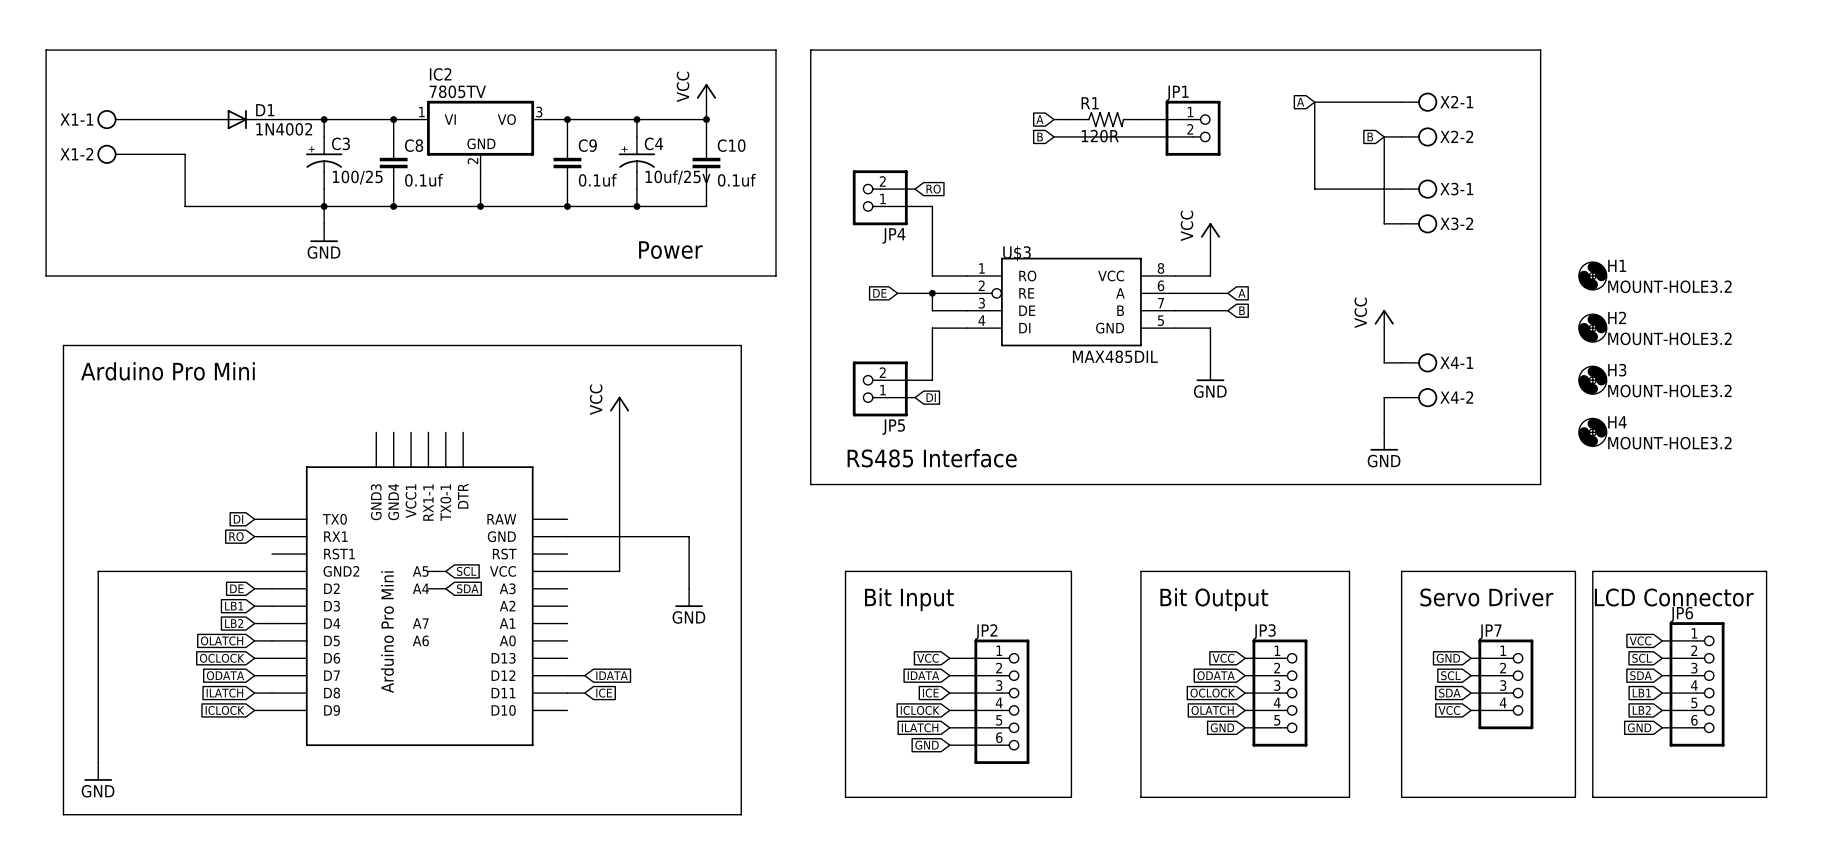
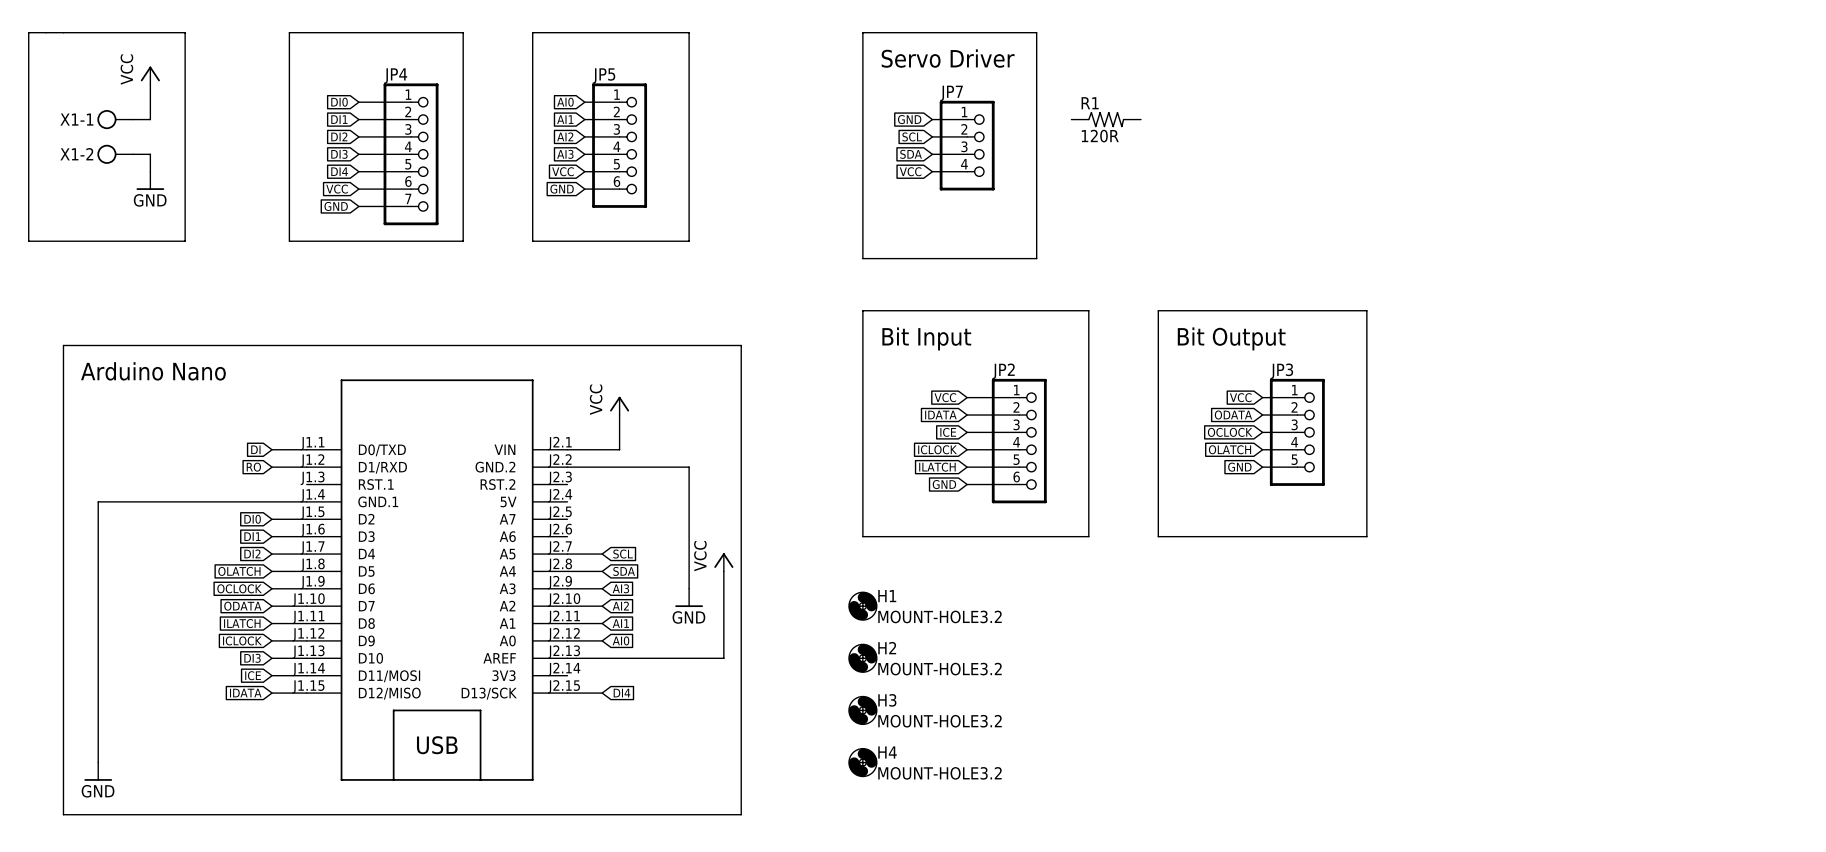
wire: none -> (289, 32) (463, 32) (463, 241) (289, 241) (289, 32)
wire: none -> (532, 32) (689, 32) (689, 241) (532, 241) (532, 32)
wire: none -> (862, 32) (862, 258) (1036, 258) (1036, 32) (862, 32)
wire: (46, 50) (46, 275) (775, 275) (775, 50) (46, 50) -> none
text: none -> Servo Driver (948, 58)
power symbol: none -> VCC (150, 75)
power symbol: VCC (706, 93) -> none
global label: none -> DI0 (339, 102)
wire: none -> (358, 102) (411, 102)
global label: none -> AI0 (565, 102)
wire: (706, 102) (706, 136) -> none
global label: A (1300, 102) -> none
wire: (1401, 102) (1314, 102) (1314, 189) (1401, 189) -> none
X2-1: (1419, 102) -> none
wire: (150, 119) (219, 119) -> (150, 119) (150, 84)
D1: 1N4002 (237, 119) -> none
wire: (254, 119) (358, 119) -> none
wire: (324, 119) (324, 136) -> none
junction: (324, 119) -> none
global label: none -> DI1 (339, 119)
wire: (393, 119) (393, 136) -> none
junction: (393, 119) -> none
wire: (550, 119) (584, 119) -> (584, 102) (619, 102)
global label: none -> AI1 (565, 119)
wire: (567, 119) (567, 136) -> none
junction: (567, 119) -> none
wire: (619, 119) (706, 119) -> none
wire: (636, 119) (636, 136) -> none
junction: (636, 119) -> none
junction: (706, 119) -> none
global label: none -> GND (909, 119)
wire: none -> (932, 119) (967, 119)
global label: A (1039, 119) -> none
wire: (1054, 119) (1071, 119) -> none
wire: (1140, 119) (1193, 119) -> none
JP1: (1193, 128) -> none
global label: none -> DI2 (339, 136)
wire: none -> (358, 136) (411, 136)
IC2: 7805TV (480, 136) -> none
global label: none -> AI2 (565, 136)
wire: none -> (584, 136) (619, 136)
global label: none -> SCL (912, 136)
wire: none -> (932, 136) (967, 136)
global label: B (1040, 136) -> none
wire: (1054, 136) (1193, 136) -> none
global label: B (1370, 136) -> none
wire: (1401, 136) (1384, 136) (1384, 223) (1401, 223) -> none
X2-2: (1419, 136) -> none
wire: (150, 154) (185, 154) -> (150, 154) (150, 171)
global label: none -> DI3 (339, 154)
wire: none -> (358, 154) (411, 154)
global label: none -> AI3 (565, 154)
wire: none -> (584, 154) (619, 154)
global label: none -> SDA (911, 154)
wire: none -> (932, 154) (967, 154)
C3: 100/25 (324, 163) -> none
C8: 0.1uf (393, 163) -> none
C9: 0.1uf (567, 163) -> none
C4: 10uf/25v (636, 163) -> none
C10: 0.1uf (706, 163) -> none
JP4 symbol: [852, 170, 908, 226] -> [383, 83, 439, 226]
global label: none -> DI4 (339, 171)
wire: none -> (358, 171) (411, 171)
wire: (480, 171) (480, 206) -> none
global label: none -> VCC (562, 171)
wire: none -> (584, 171) (619, 171)
global label: none -> VCC (910, 171)
power symbol: none -> GND (150, 180)
wire: (324, 189) (324, 223) -> none
global label: none -> VCC (337, 189)
wire: none -> (358, 189) (411, 189)
wire: (393, 189) (393, 206) -> none
global label: none -> GND (562, 189)
wire: (567, 189) (567, 206) -> none
wire: none -> (584, 189) (619, 189)
wire: (636, 189) (636, 206) -> none
wire: (706, 189) (706, 206) (411, 206) -> none
wire: (880, 189) (915, 189) -> (932, 171) (967, 171)
global label: RO (933, 189) -> none
X3-1: (1419, 189) -> none
wire: (185, 206) (358, 206) -> (185, 206) (185, 241) (28, 241) (28, 32) (185, 32) (185, 154)
junction: (324, 206) -> none
global label: none -> GND (336, 206)
junction: (393, 206) -> none
junction: (480, 206) -> none
junction: (567, 206) -> none
junction: (636, 206) -> none
wire: (880, 206) (932, 206) (932, 275) (967, 275) -> none
X3-2: (1419, 223) -> none
power symbol: GND (324, 232) -> none
power symbol: VCC (1210, 232) -> none
JP4 name position: JP4 (894, 235) -> JP4 (395, 76)
wire: (1210, 241) (1210, 275) (1175, 275) -> none
text: Power (670, 250) -> none
H1 position: (1592, 275) -> (862, 606)
global label: DE (879, 293) -> none
wire: (897, 293) (967, 293) -> none
wire: (932, 293) (932, 310) -> (967, 310) (1088, 310) (1088, 536) (862, 536) (862, 310) (932, 310)
junction: (932, 293) -> none
wire: (1175, 293) (1227, 293) -> none
global label: A (1241, 293) -> none
U$3: MAX485DIL (1071, 302) -> none
wire: none -> (1175, 310) (1158, 310) (1158, 536) (1366, 536) (1366, 310) (1227, 310)
global label: B (1242, 310) -> none
power symbol: VCC (1384, 318) -> none
wire: (967, 328) (932, 328) (932, 380) (880, 380) -> none
wire: (1175, 328) (1210, 328) (1210, 362) -> none
wire: (1384, 328) (1384, 362) (1401, 362) -> none
H2 position: (1592, 328) -> (862, 658)
text: none -> Bit Input (926, 338)
text: none -> Bit Output (1231, 338)
JP5 symbol: [852, 361, 908, 417] -> [592, 83, 648, 208]
X4-1: (1419, 362) -> none
text: Arduino Pro Mini (167, 371) -> Arduino Nano (153, 371)
power symbol: GND (1210, 371) -> none
H3 position: (1592, 380) -> (862, 710)
wire: (880, 397) (915, 397) -> none
global label: DI (931, 397) -> none
global label: none -> VCC (945, 397)
wire: none -> (967, 397) (1019, 397)
global label: none -> VCC (1240, 397)
wire: none -> (1262, 397) (1297, 397)
wire: (1401, 397) (1384, 397) (1384, 432) -> none
X4-2: (1419, 397) -> none
global label: none -> IDATA (940, 415)
wire: none -> (967, 415) (1019, 415)
global label: none -> ODATA (1233, 415)
wire: none -> (1262, 415) (1297, 415)
JP5 name position: JP5 (893, 427) -> JP5 (603, 76)
global label: none -> ICE (948, 432)
wire: none -> (967, 432) (1019, 432)
global label: none -> OCLOCK (1230, 432)
wire: none -> (1262, 432) (1297, 432)
H4 position: (1592, 432) -> (862, 762)
power symbol: GND (1384, 441) -> none
wire: none -> (272, 449) (306, 449)
wire: (619, 449) (619, 571) (602, 571) -> (619, 449) (567, 449)
global label: none -> ICLOCK (937, 449)
wire: none -> (967, 449) (1019, 449)
global label: none -> OLATCH (1230, 449)
wire: none -> (1262, 449) (1297, 449)
text: RS485 Interface (932, 458) -> none
wire: none -> (272, 467) (306, 467)
global label: none -> ILATCH (937, 467)
wire: none -> (967, 467) (1019, 467)
global label: none -> GND (1239, 467)
wire: none -> (1262, 467) (1297, 467)
global label: none -> GND (944, 484)
wire: (967, 484) (810, 484) (810, 50) (1540, 50) (1540, 484) (1019, 484) -> none
global label position: DI (238, 519) -> DI (255, 449)
global label: none -> DI0 (252, 519)
global label position: RO (236, 536) -> RO (253, 467)
global label: none -> DI1 (252, 536)
wire: (567, 536) (689, 536) -> (567, 467) (689, 467) (689, 536)
global label: none -> DI2 (252, 553)
wire: none -> (567, 554) (602, 554)
power symbol: none -> VCC (723, 562)
wire: (98, 571) (272, 571) -> (98, 571) (98, 501) (306, 501)
wire: (428, 571) (445, 571) -> none
global label position: SCL (466, 571) -> SCL (623, 554)
wire: none -> (723, 571) (723, 658) (567, 658)
wire: (845, 571) (1071, 571) (1071, 797) (845, 797) (845, 571) -> none
wire: (1140, 571) (1349, 571) (1349, 797) (1140, 797) (1140, 571) -> none
wire: (1401, 571) (1575, 571) (1575, 797) (1401, 797) (1401, 571) -> none
wire: (1592, 571) (1766, 571) (1766, 797) (1592, 797) (1592, 571) -> none
part: none -> (437, 580)
global label: DE (236, 588) -> none
wire: (428, 588) (445, 588) -> none
global label position: SDA (467, 588) -> SDA (624, 571)
wire: none -> (567, 588) (602, 588)
global label: none -> AI3 (620, 588)
part: (419, 589) -> none
text: Servo Driver (1486, 597) -> none
text: LCD Connector (1674, 597) -> none
text: Bit Input (909, 599) -> none
text: Bit Output (1214, 599) -> none
global label: LB1 (234, 606) -> none
wire: none -> (567, 606) (602, 606)
global label: none -> AI2 (620, 606)
global label: LB2 (234, 623) -> none
wire: none -> (567, 623) (602, 623)
global label: none -> AI1 (620, 623)
global label position: OLATCH (222, 640) -> OLATCH (239, 571)
wire: none -> (567, 640) (602, 640)
global label: none -> AI0 (620, 640)
global label: VCC (1640, 640) -> none
wire: (1662, 640) (1697, 640) -> none
global label position: OCLOCK (222, 658) -> OCLOCK (239, 588)
global label: none -> DI3 (252, 658)
global label: VCC (927, 658) -> none
wire: (949, 658) (1001, 658) -> none
global label: VCC (1223, 658) -> none
wire: (1245, 658) (1279, 658) -> none
global label: GND (1448, 658) -> none
wire: (1471, 658) (1505, 658) -> none
global label: SCL (1642, 658) -> none
wire: (1662, 658) (1697, 658) -> none
global label position: ODATA (225, 675) -> ODATA (242, 606)
global label: none -> ICE (253, 675)
wire: (567, 675) (584, 675) -> (584, 693) (602, 693)
global label: IDATA (612, 675) -> none
global label: IDATA (923, 675) -> none
wire: (949, 675) (1001, 675) -> none
global label: ODATA (1216, 675) -> none
wire: (1245, 675) (1279, 675) -> none
global label: SCL (1450, 675) -> none
wire: (1471, 675) (1505, 675) -> none
global label: SDA (1640, 675) -> none
wire: (1662, 675) (1697, 675) -> none
JP7 position: (1505, 684) -> (967, 145)
JP6: (1697, 684) -> none
global label position: ILATCH (224, 693) -> ILATCH (242, 623)
global label: none -> IDATA (245, 693)
global label: ICE (604, 693) -> none
global label: none -> DI4 (621, 693)
global label: ICE (930, 693) -> none
wire: (949, 693) (1001, 693) -> none
global label: OCLOCK (1212, 693) -> none
wire: (1245, 693) (1279, 693) -> none
JP3 position: (1279, 693) -> (1297, 432)
global label: SDA (1449, 693) -> none
wire: (1471, 693) (1505, 693) -> none
global label: LB1 (1641, 693) -> none
wire: (1662, 693) (1697, 693) -> none
JP2 position: (1001, 701) -> (1019, 441)
global label position: ICLOCK (225, 710) -> ICLOCK (242, 640)
wire: (254, 710) (272, 710) -> none
global label: ICLOCK (920, 710) -> none
wire: (949, 710) (1001, 710) -> none
global label: OLATCH (1212, 710) -> none
wire: (1245, 710) (1279, 710) -> none
global label: VCC (1449, 710) -> none
wire: (1471, 710) (1505, 710) -> none
global label: LB2 (1641, 710) -> none
wire: (1662, 710) (1697, 710) -> none
global label: ILATCH (920, 727) -> none
wire: (949, 727) (1001, 727) -> none
global label: GND (1222, 727) -> none
wire: (1245, 727) (1279, 727) -> none
global label: GND (1639, 727) -> none
wire: (1662, 727) (1697, 727) -> none
global label: GND (927, 745) -> none
wire: (949, 745) (1001, 745) -> none

